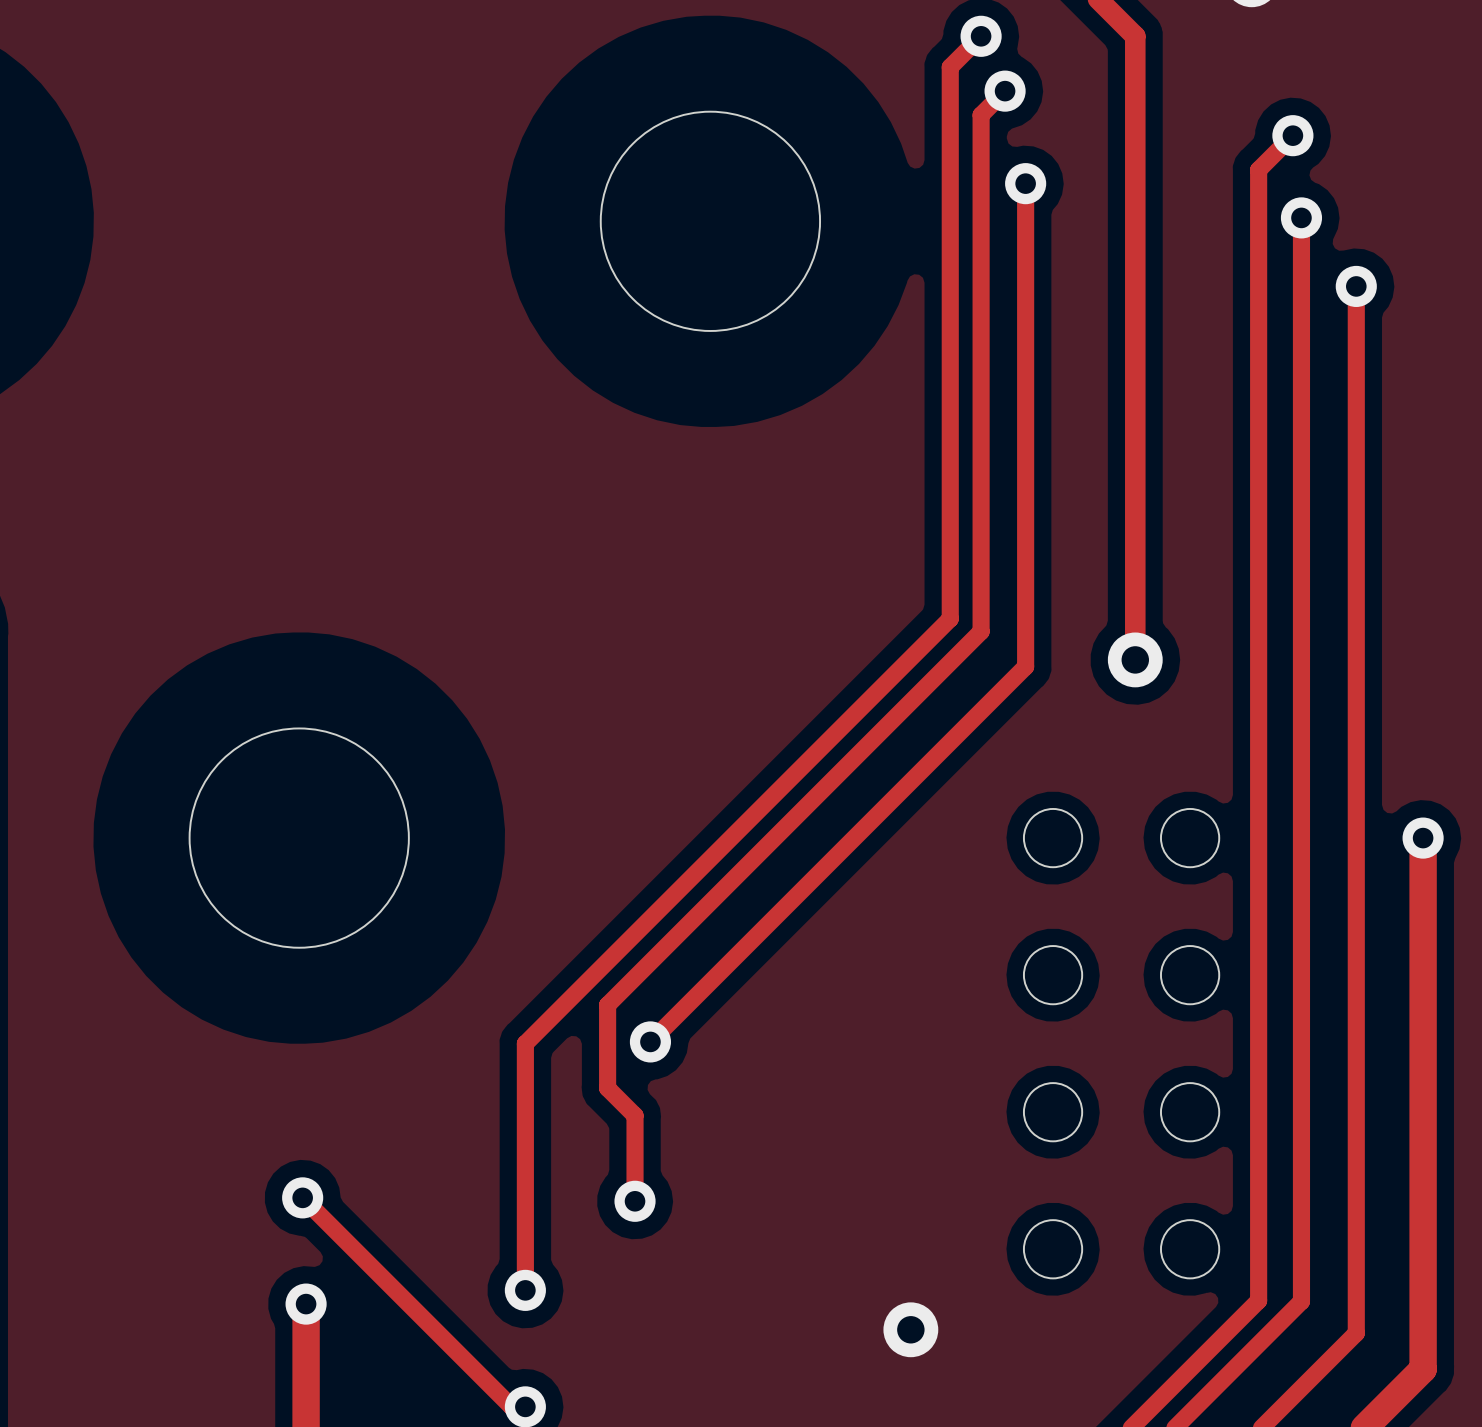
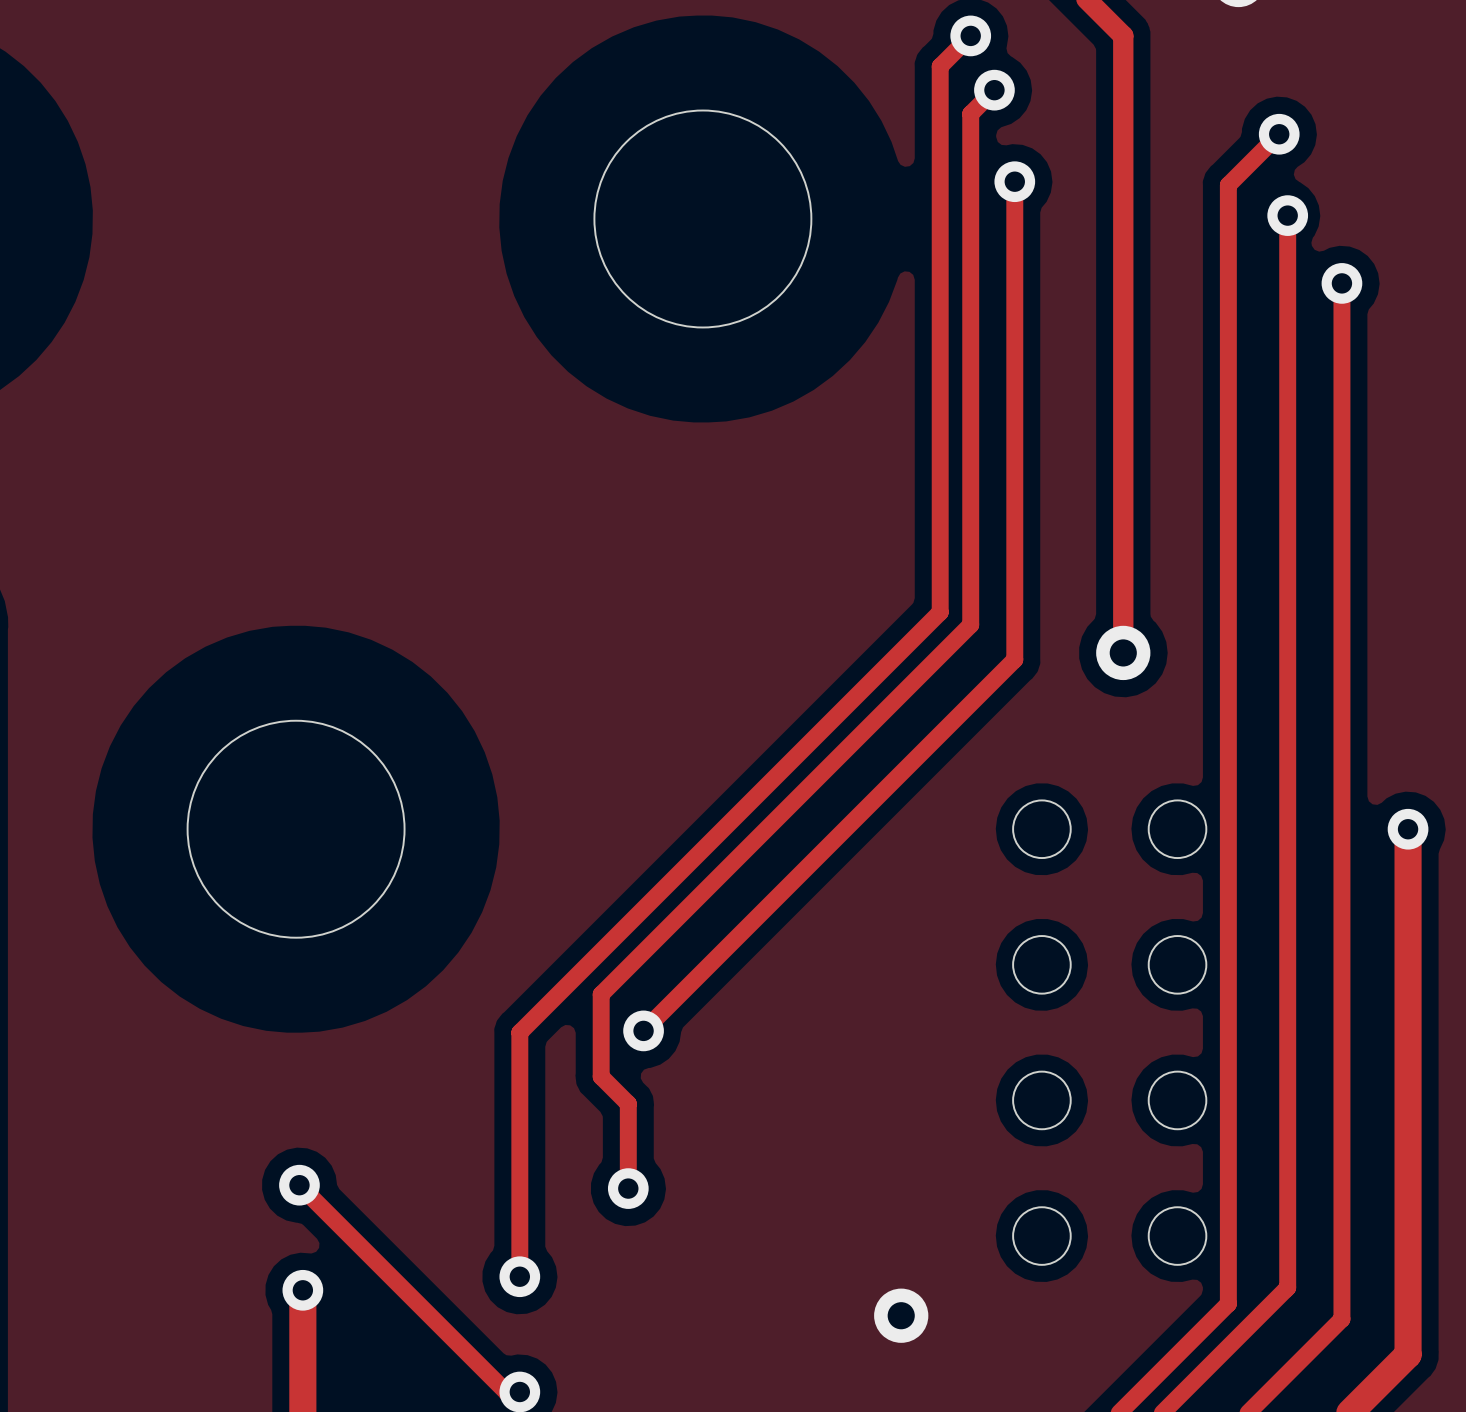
track: (1258, 169) (1258, 1300) (1241, 1317) -> (1245, 168) (1228, 185) (1228, 1303)

